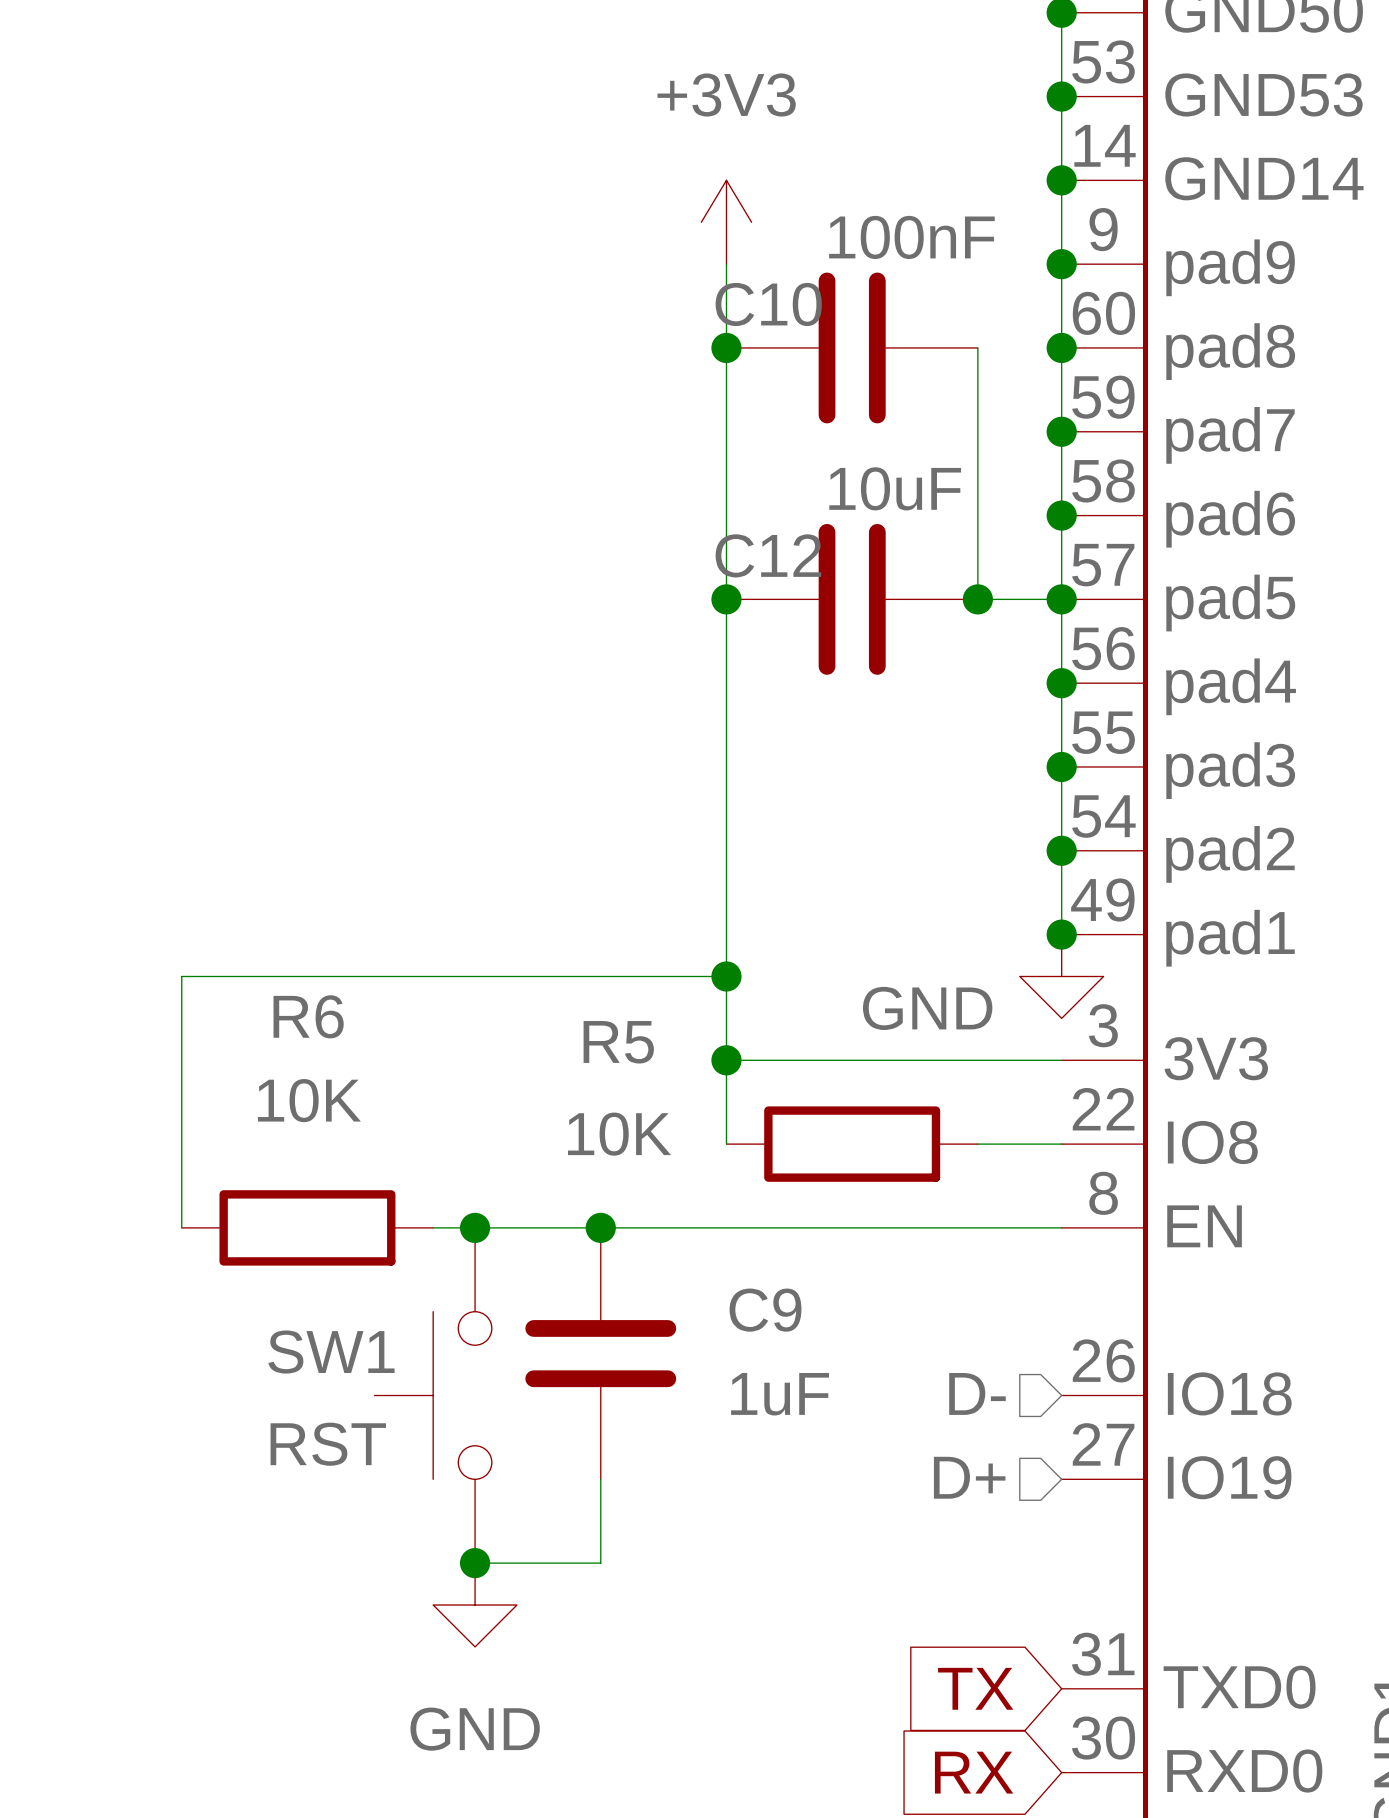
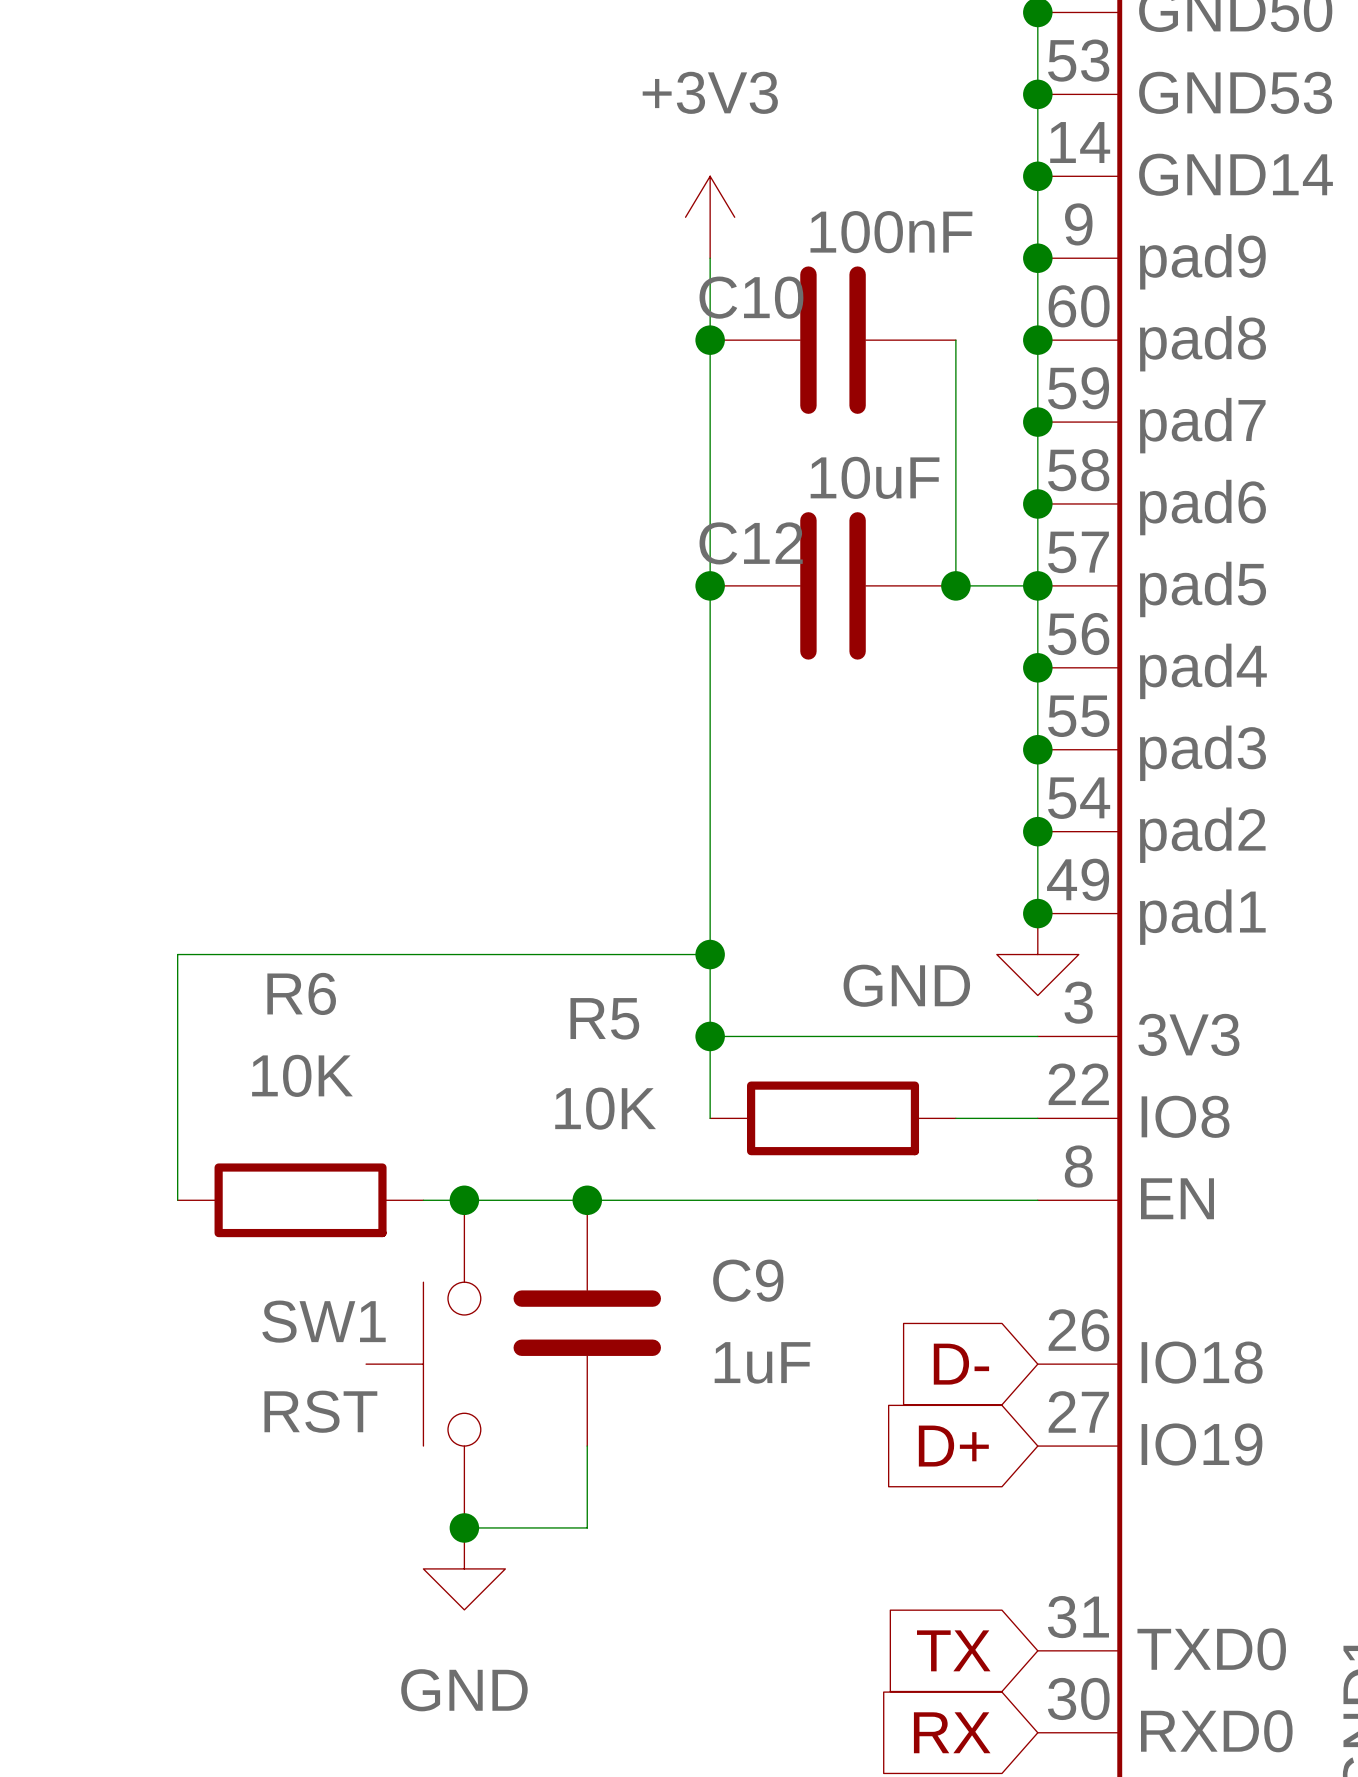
hierarchical label: D- (977, 1393) -> none
global label: none -> D- (961, 1364)
hierarchical label: D+ (969, 1477) -> none
global label: none -> D+ (953, 1446)

